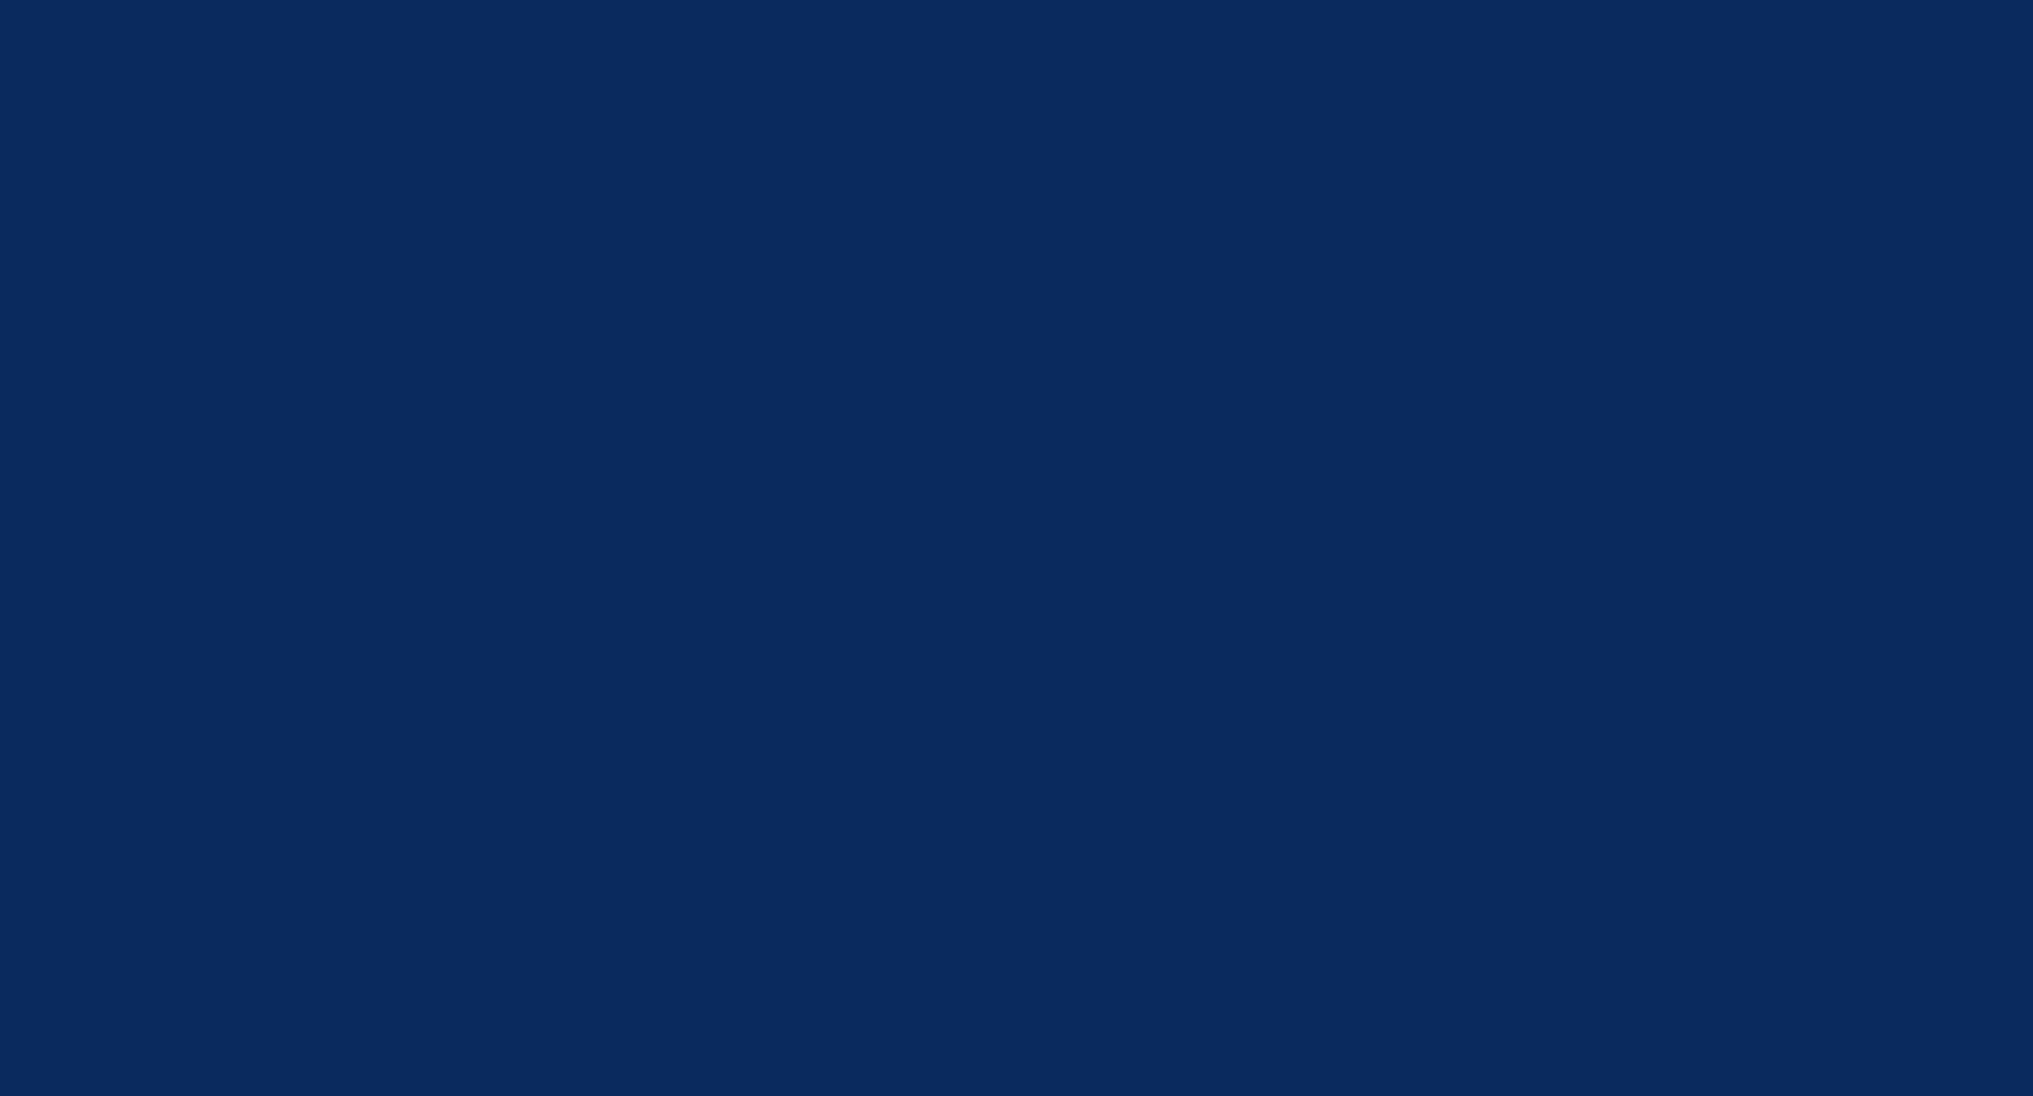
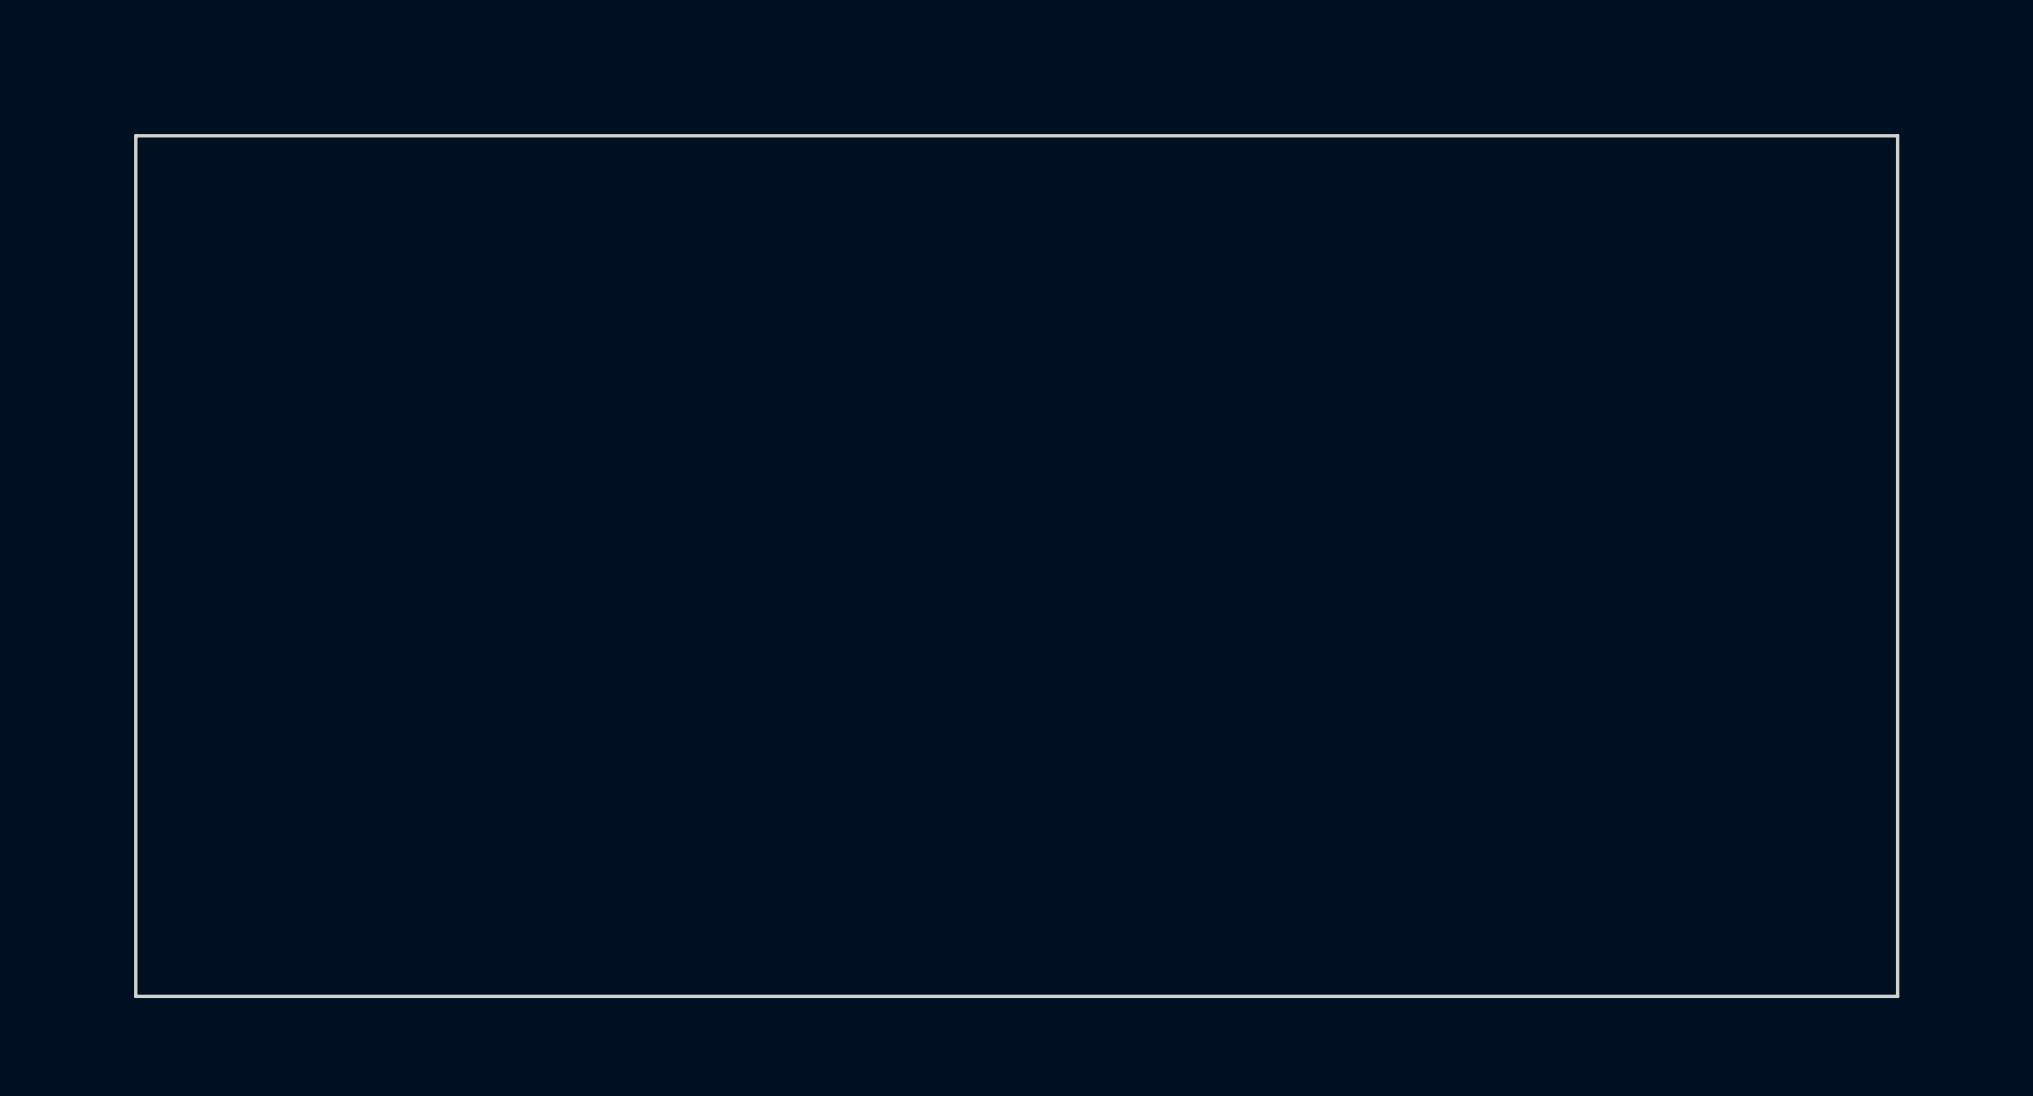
board edge: none -> (135, 135) (1897, 135) (1897, 996) (135, 996) (135, 135)

